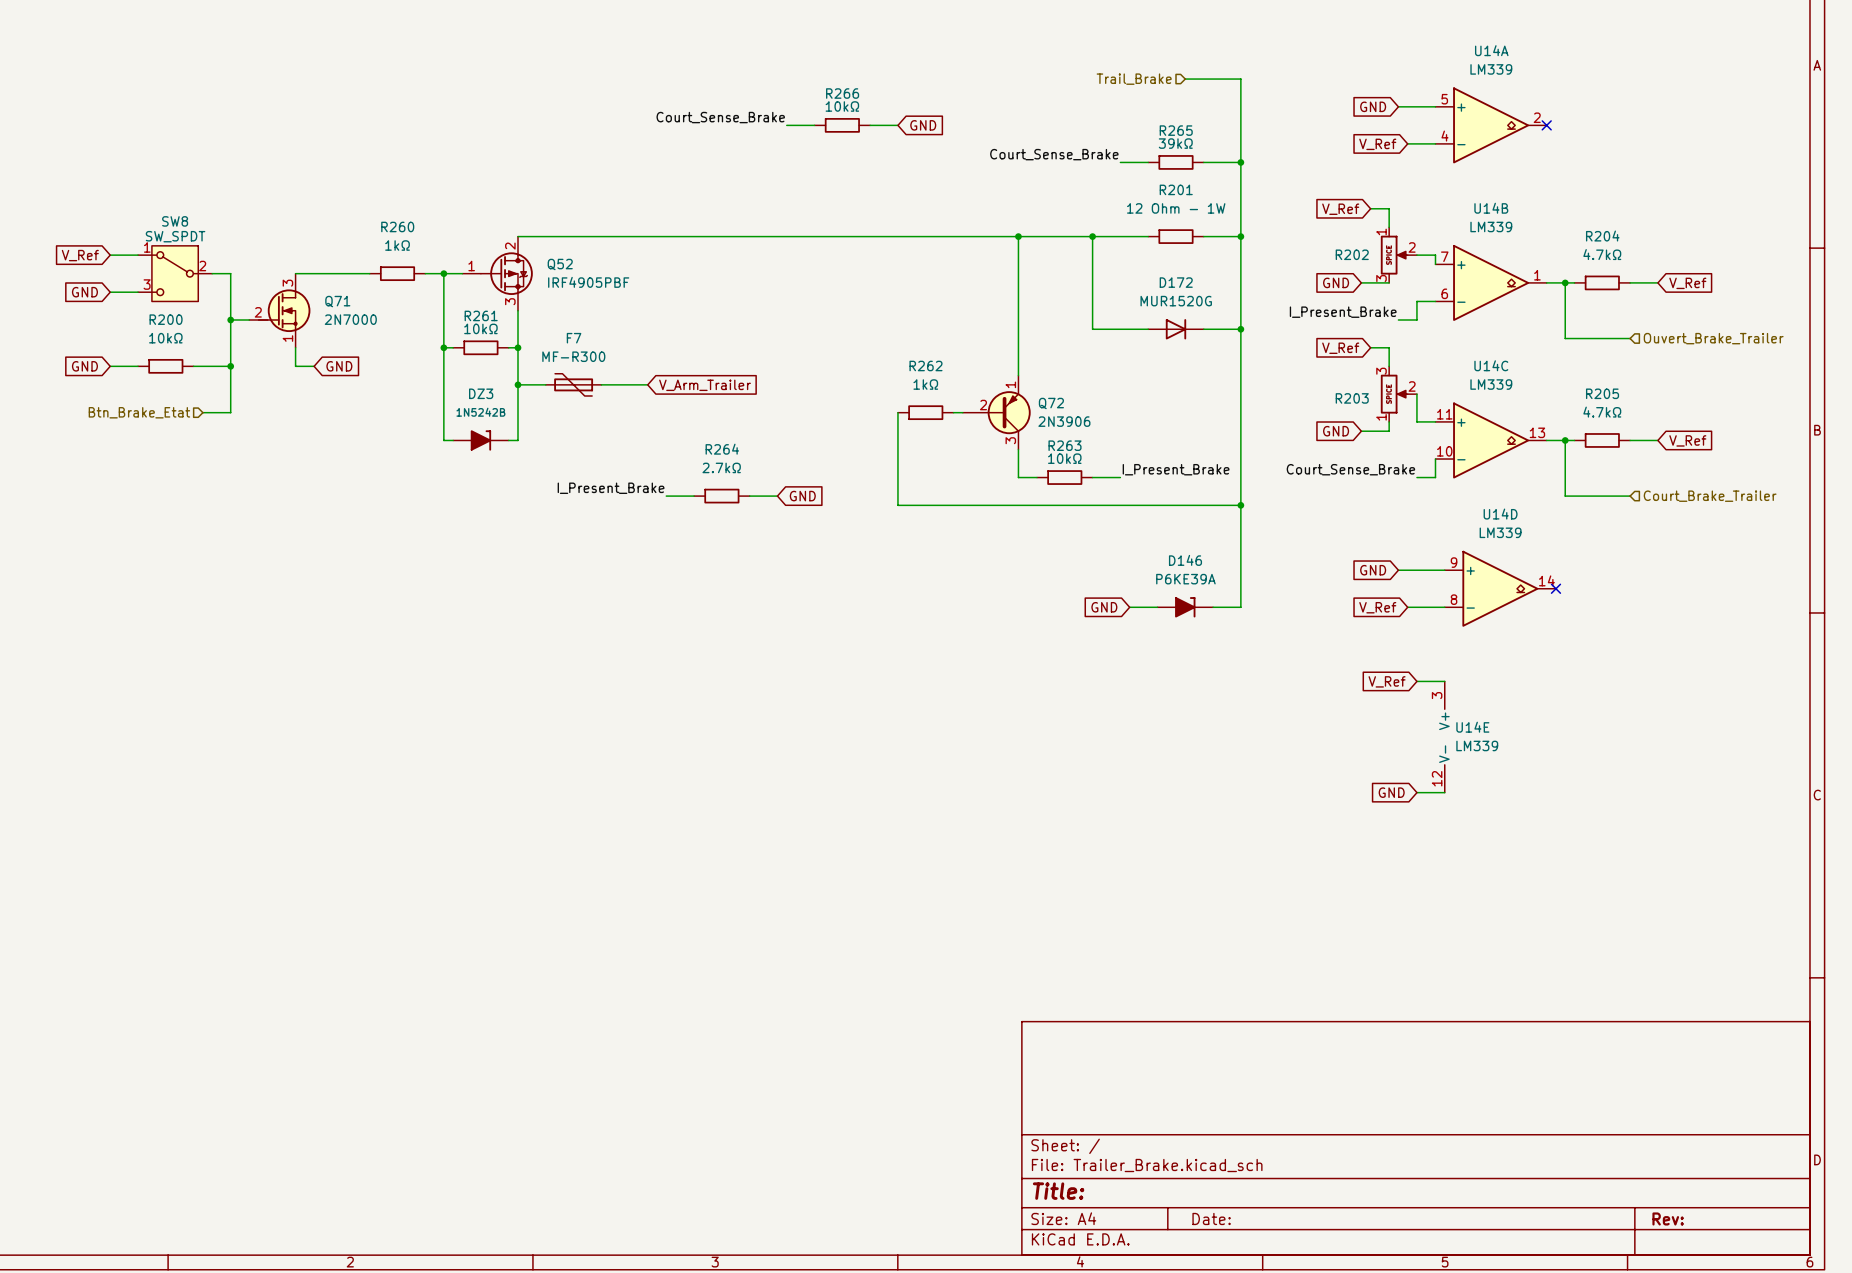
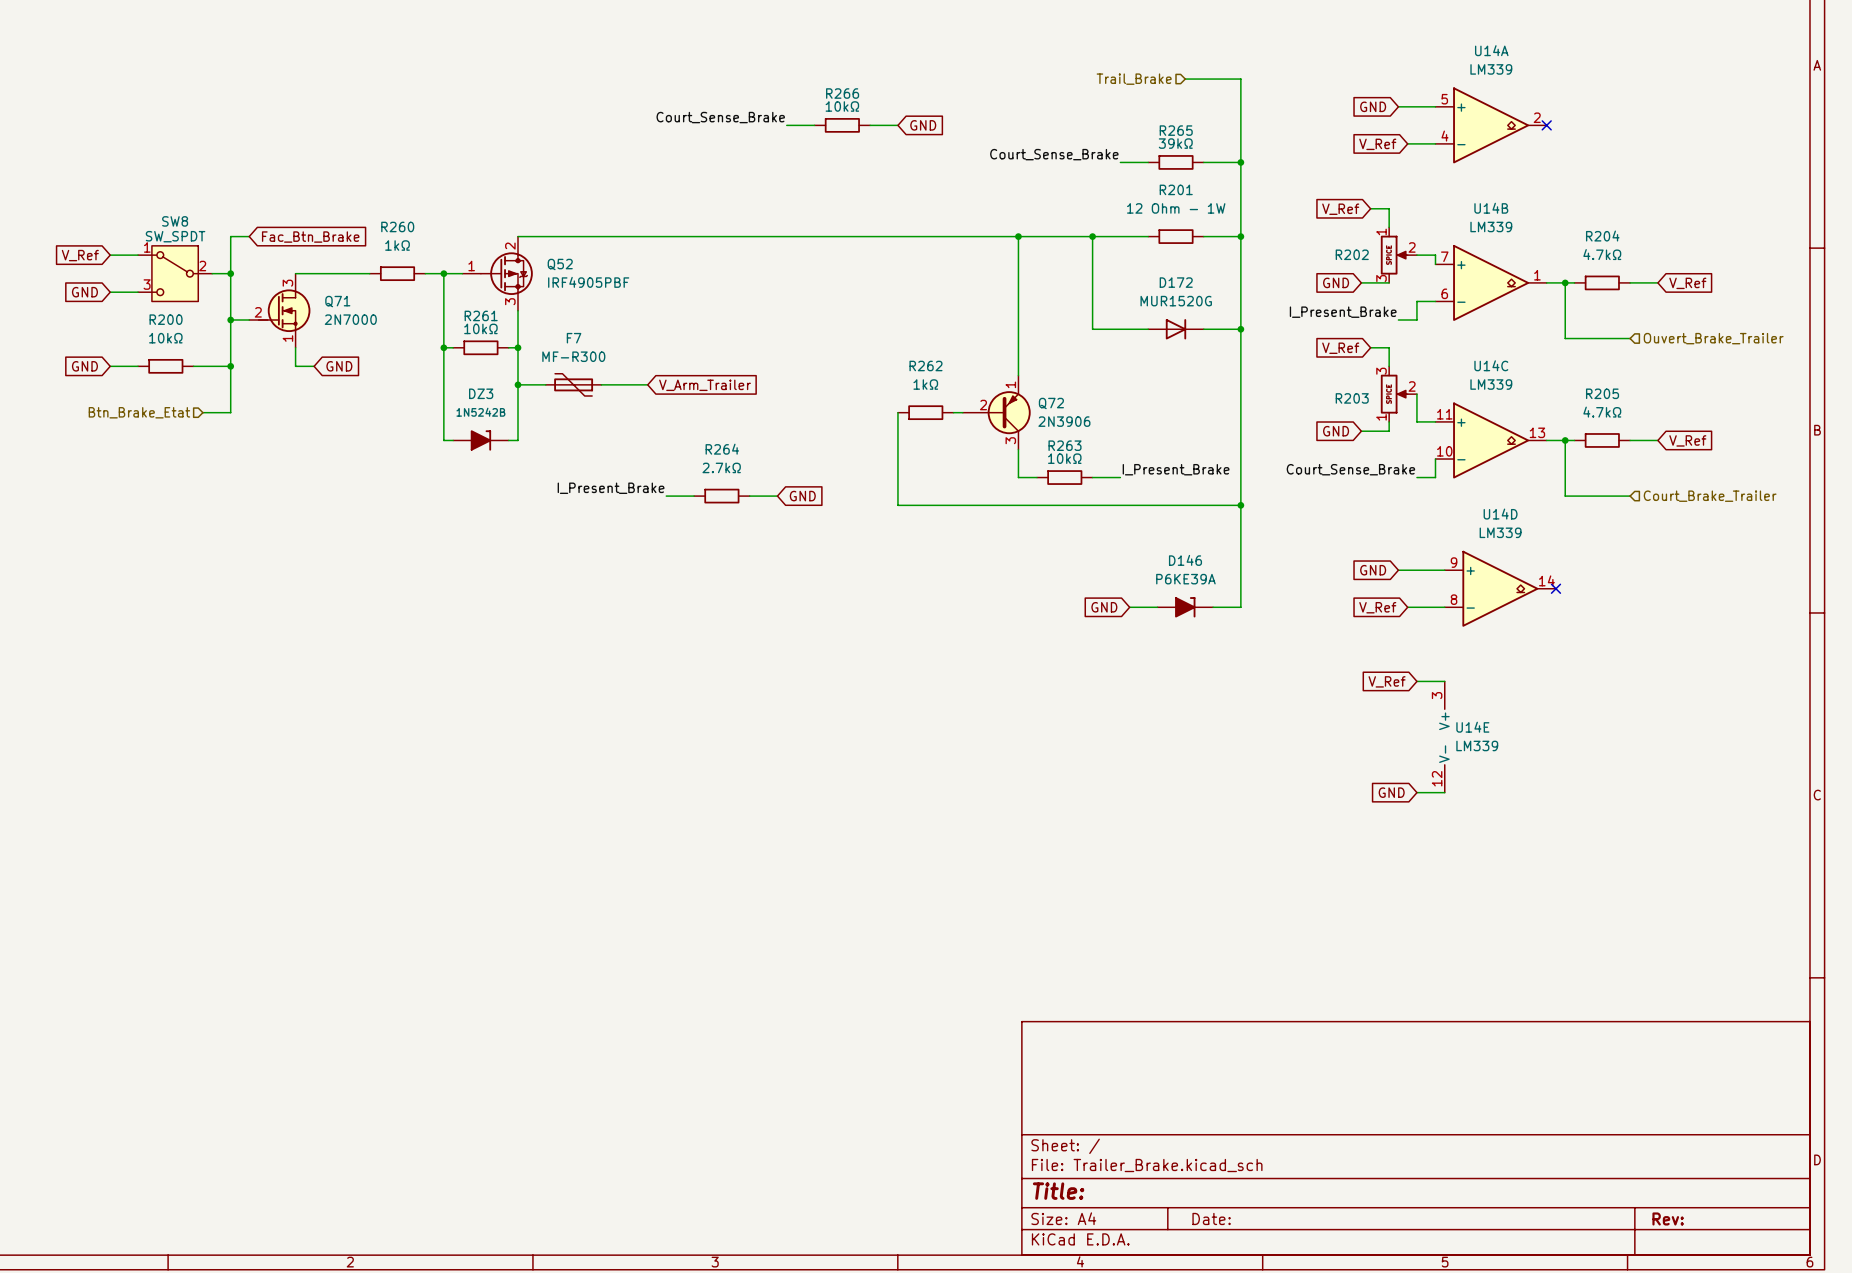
wire: none -> (249, 236) (230, 236) (230, 273)
global label: none -> Fac_Btn_Brake (310, 237)
junction: none -> (230, 273)

